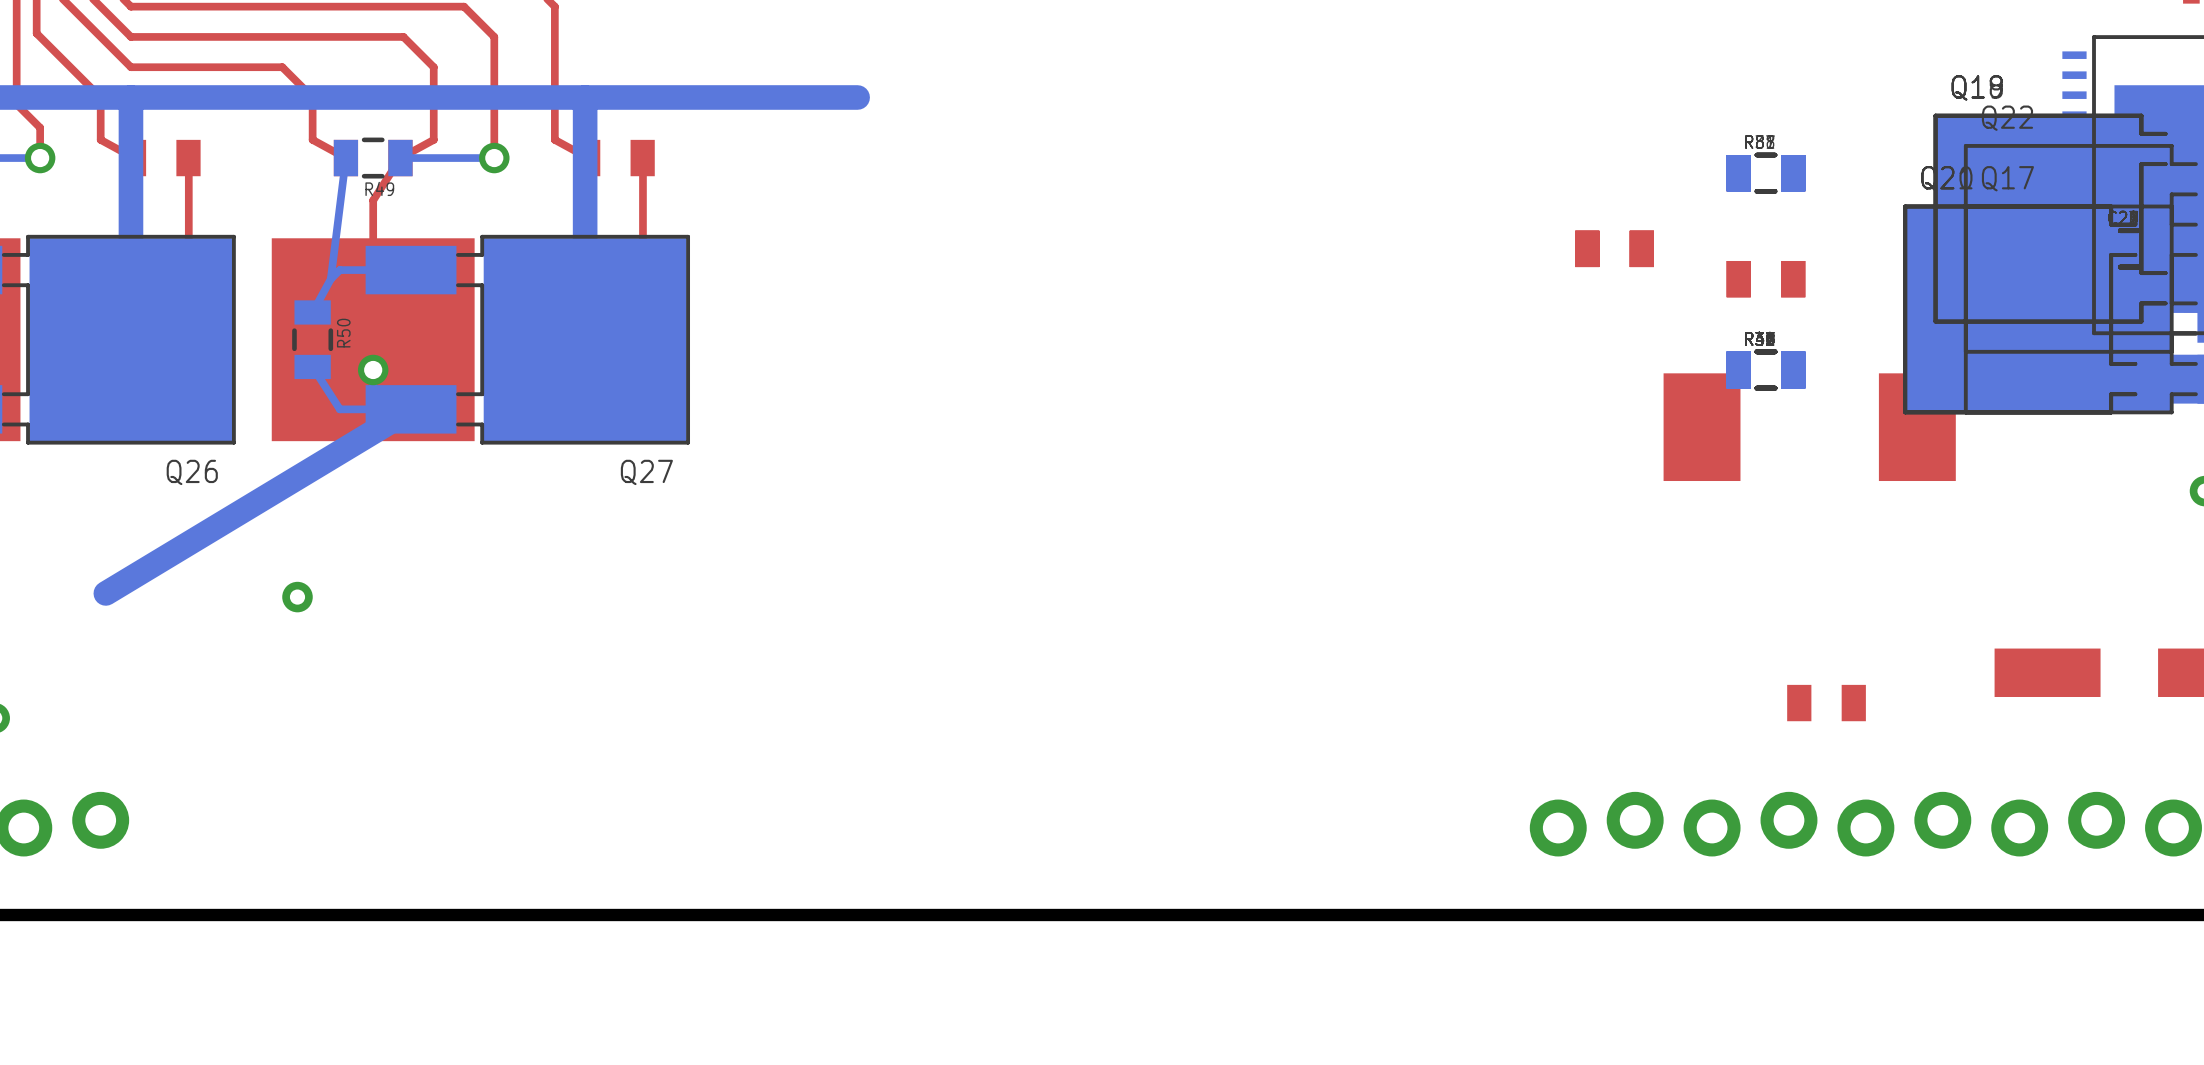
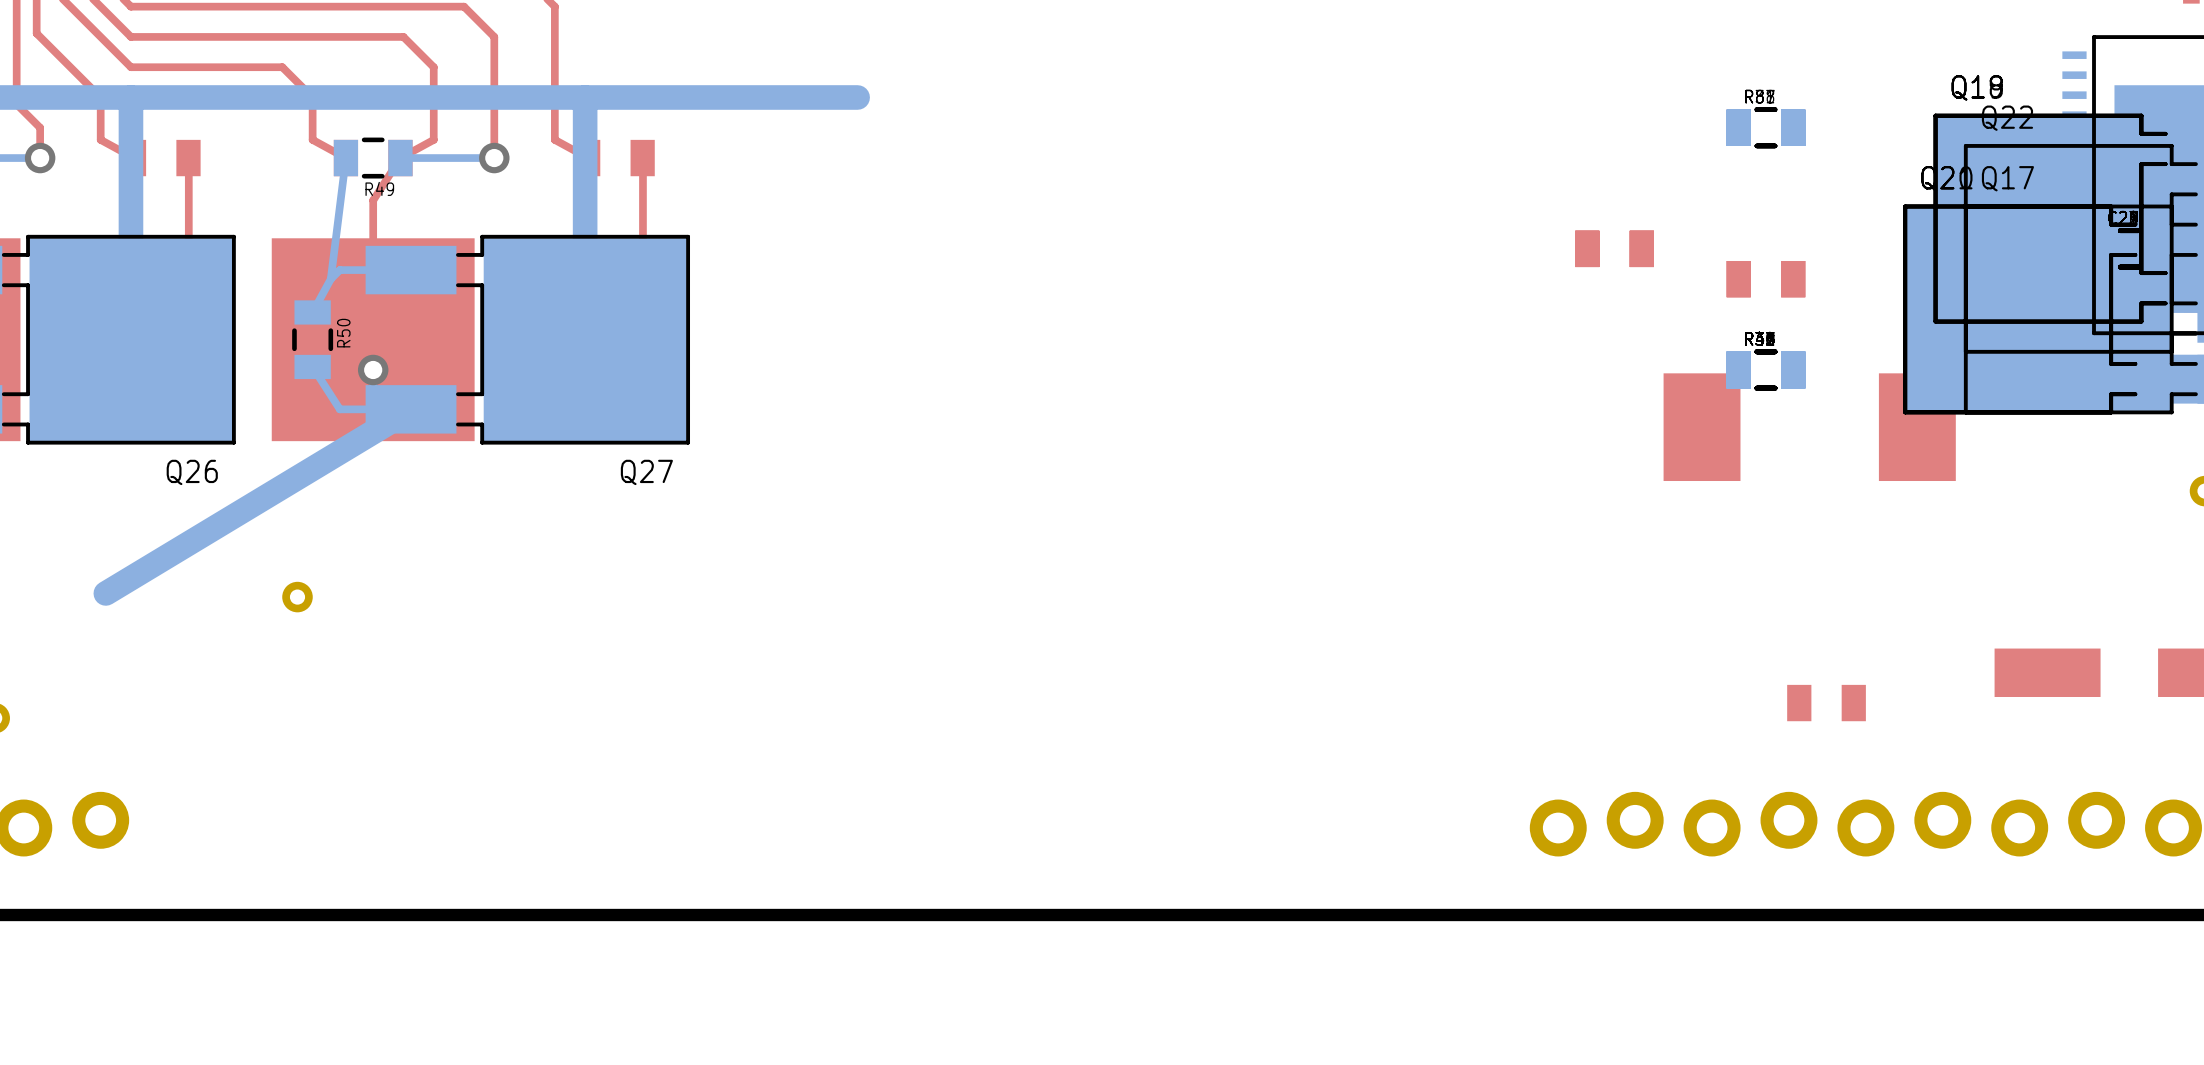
part position: (1765, 173) -> (1765, 127)
part position: (1765, 173) -> (1765, 127)
part position: (1765, 173) -> (1765, 127)

